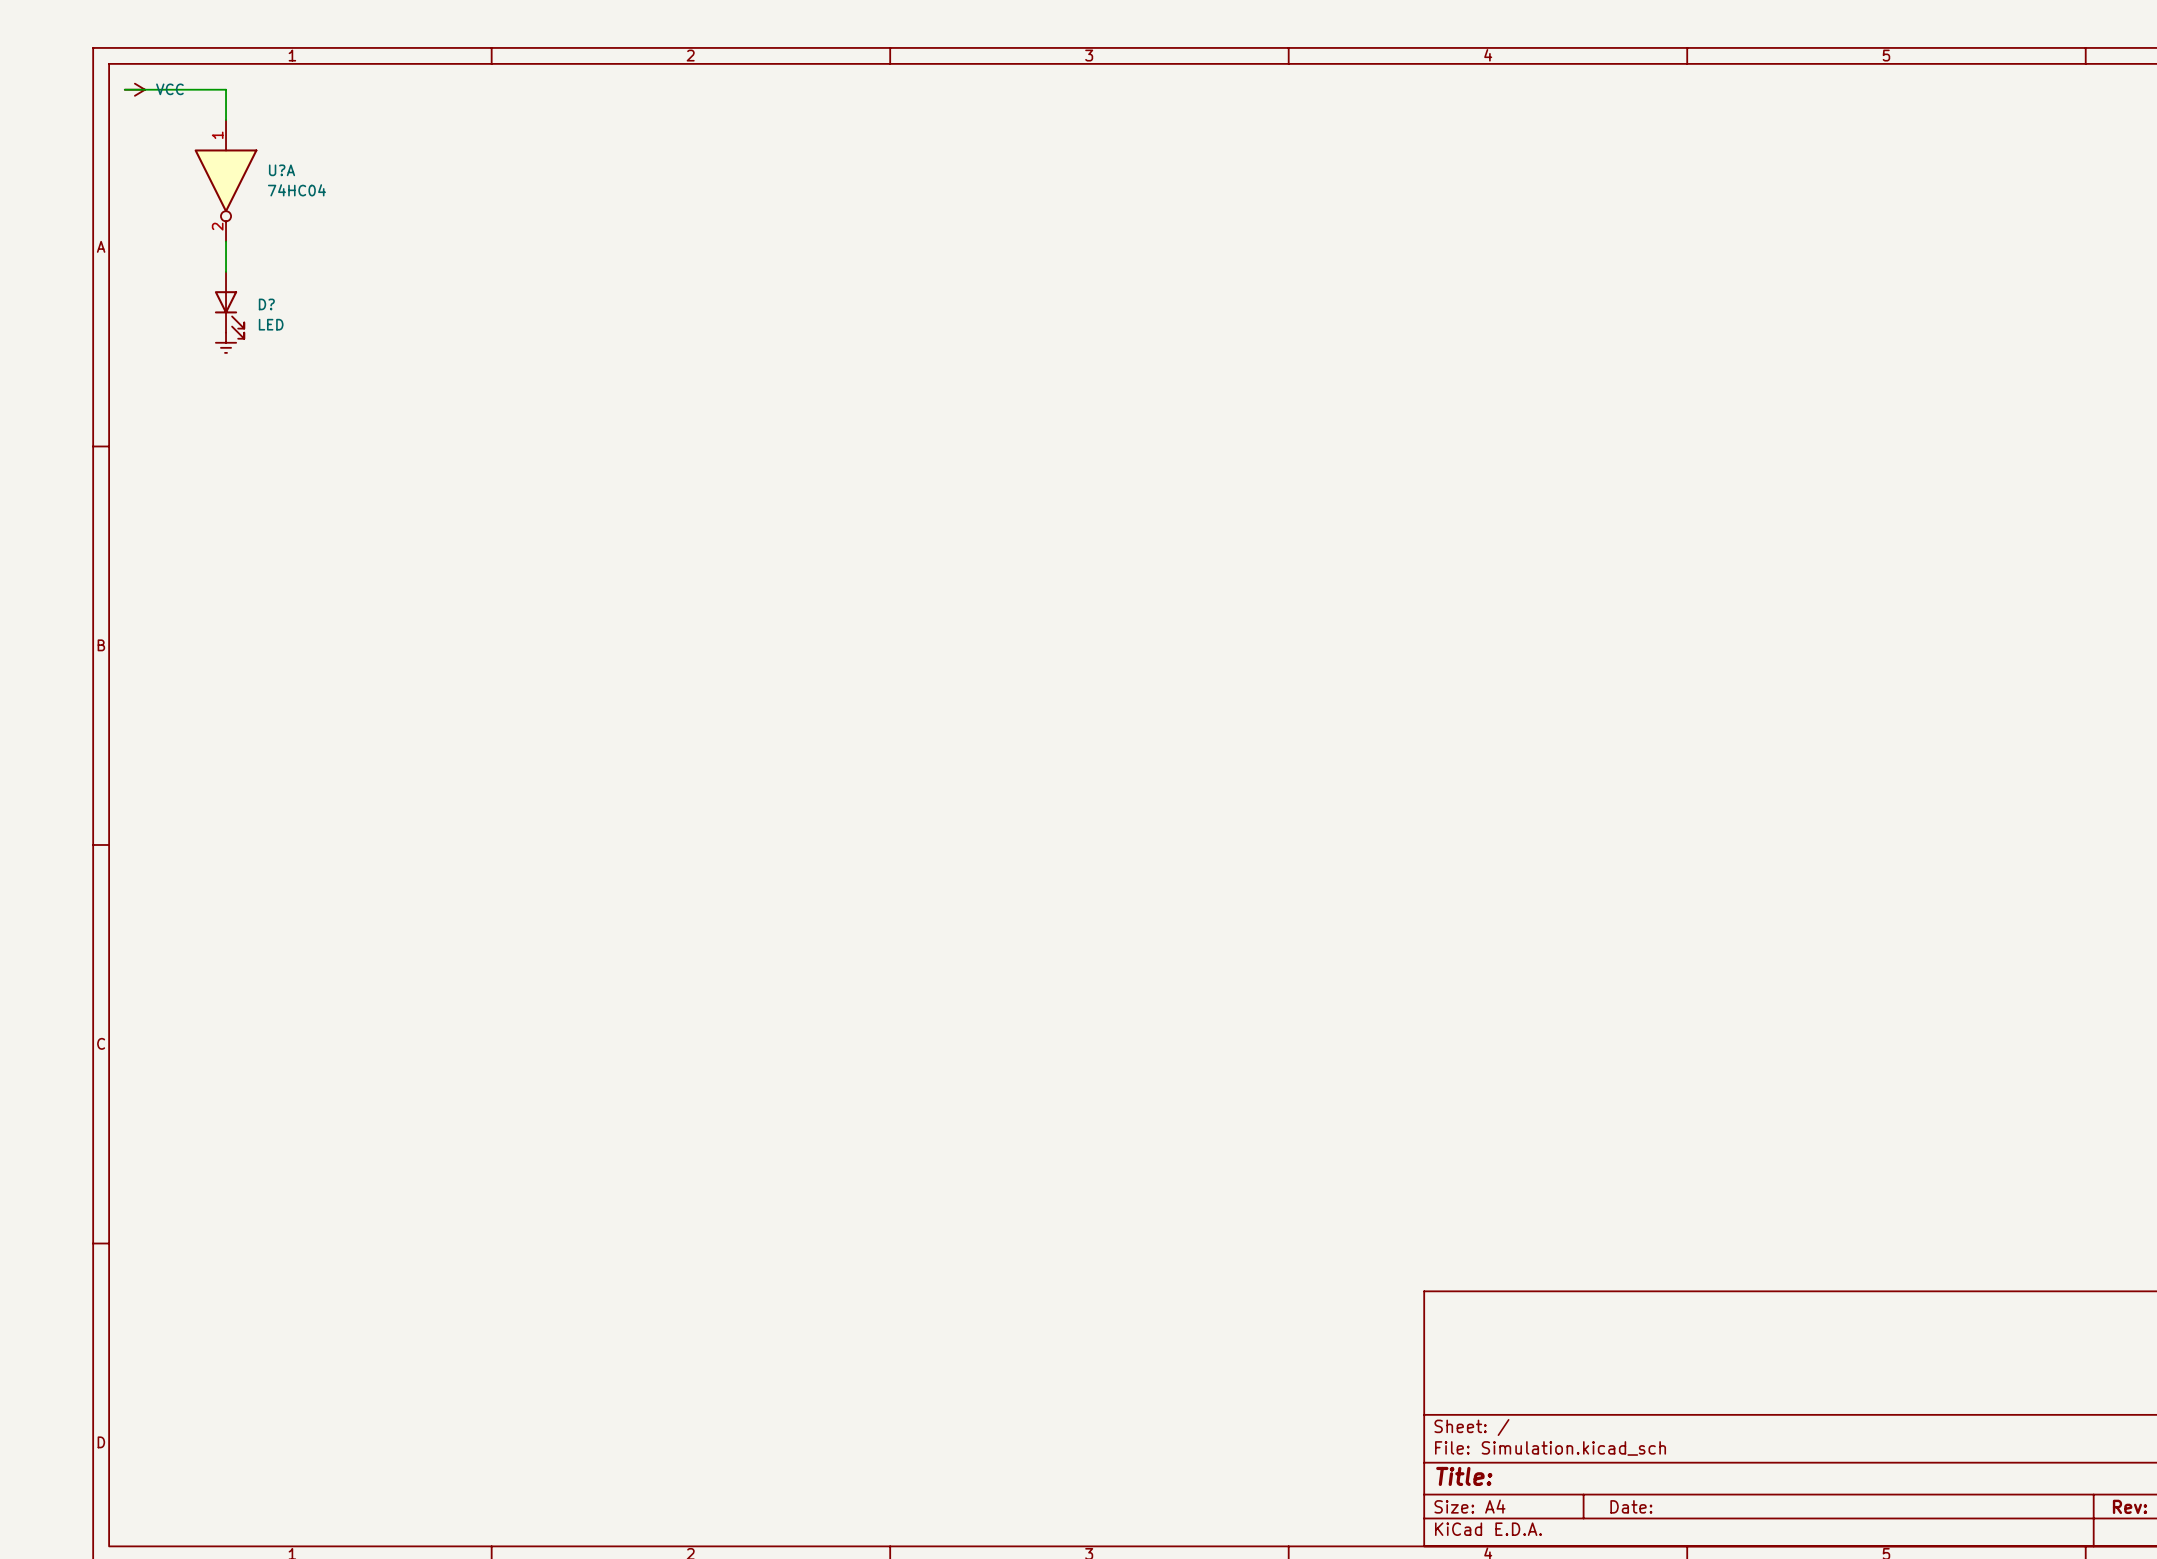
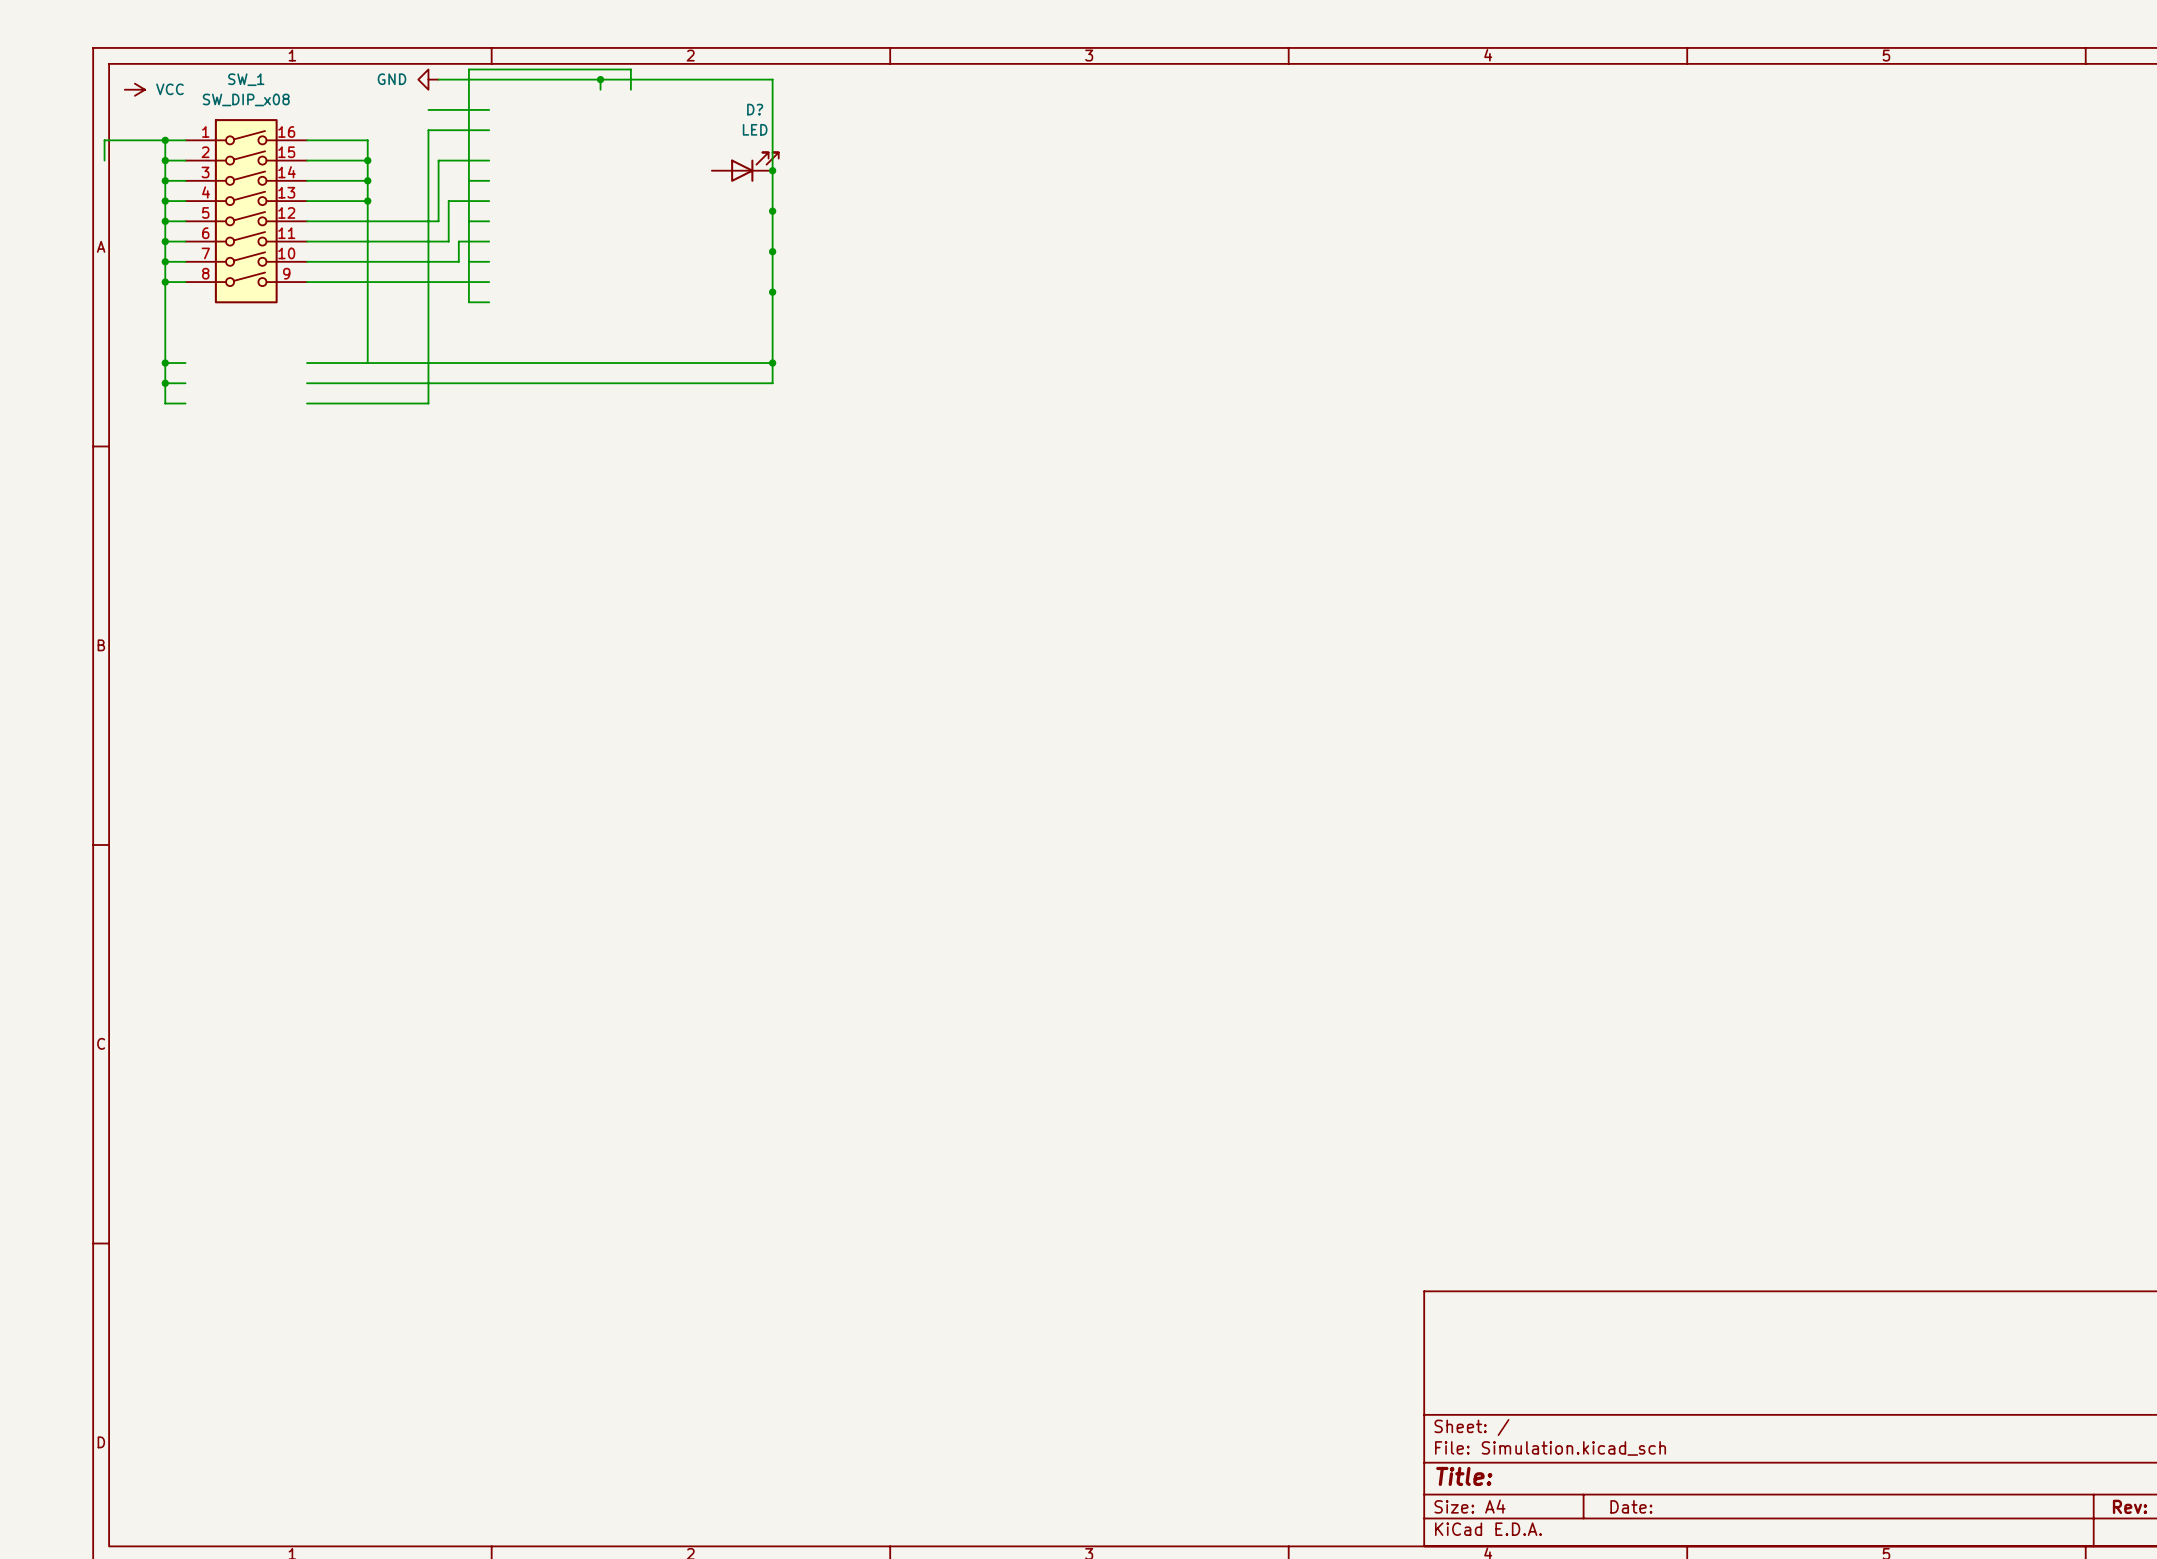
power symbol: none -> GND (428, 79)
wire: none -> (438, 79) (772, 79) (772, 383) (306, 383)
wire: none -> (600, 79) (600, 89)
junction: none -> (600, 79)
wire: (124, 89) (226, 89) (226, 120) -> none
wire: none -> (630, 89) (630, 69) (468, 69) (468, 302) (489, 302)
wire: none -> (428, 109) (489, 109)
wire: none -> (489, 130) (428, 130) (428, 403) (306, 403)
wire: none -> (165, 140) (165, 403) (185, 403)
junction: none -> (165, 140)
wire: none -> (185, 140) (104, 140) (104, 160)
wire: none -> (306, 140) (367, 140) (367, 363)
wire: none -> (165, 160) (185, 160)
junction: none -> (165, 160)
wire: none -> (306, 160) (367, 160)
junction: none -> (367, 160)
wire: none -> (489, 160) (438, 160) (438, 221) (306, 221)
D?: none -> LED (745, 167)
junction: none -> (772, 170)
wire: none -> (165, 180) (185, 180)
junction: none -> (165, 180)
U?A: 74HC04 (226, 180) -> none
wire: none -> (306, 180) (367, 180)
junction: none -> (367, 180)
wire: none -> (468, 180) (489, 180)
wire: none -> (165, 201) (185, 201)
junction: none -> (165, 201)
wire: none -> (306, 201) (367, 201)
junction: none -> (367, 201)
wire: none -> (489, 201) (448, 201) (448, 241) (306, 241)
SW_1: none -> SW_DIP_x08 (246, 211)
junction: none -> (772, 211)
wire: none -> (165, 221) (185, 221)
junction: none -> (165, 221)
wire: none -> (468, 221) (489, 221)
wire: none -> (165, 241) (185, 241)
junction: none -> (165, 241)
wire: none -> (489, 241) (458, 241) (458, 261) (306, 261)
junction: none -> (772, 251)
wire: none -> (165, 261) (185, 261)
junction: none -> (165, 261)
wire: none -> (468, 261) (489, 261)
wire: none -> (165, 282) (185, 282)
junction: none -> (165, 282)
wire: none -> (306, 282) (489, 282)
junction: none -> (772, 292)
D?: LED (229, 305) -> none
power symbol: (226, 342) -> none
wire: none -> (165, 363) (185, 363)
junction: none -> (165, 363)
wire: none -> (306, 363) (772, 363)
junction: none -> (772, 363)
wire: none -> (165, 383) (185, 383)
junction: none -> (165, 383)

